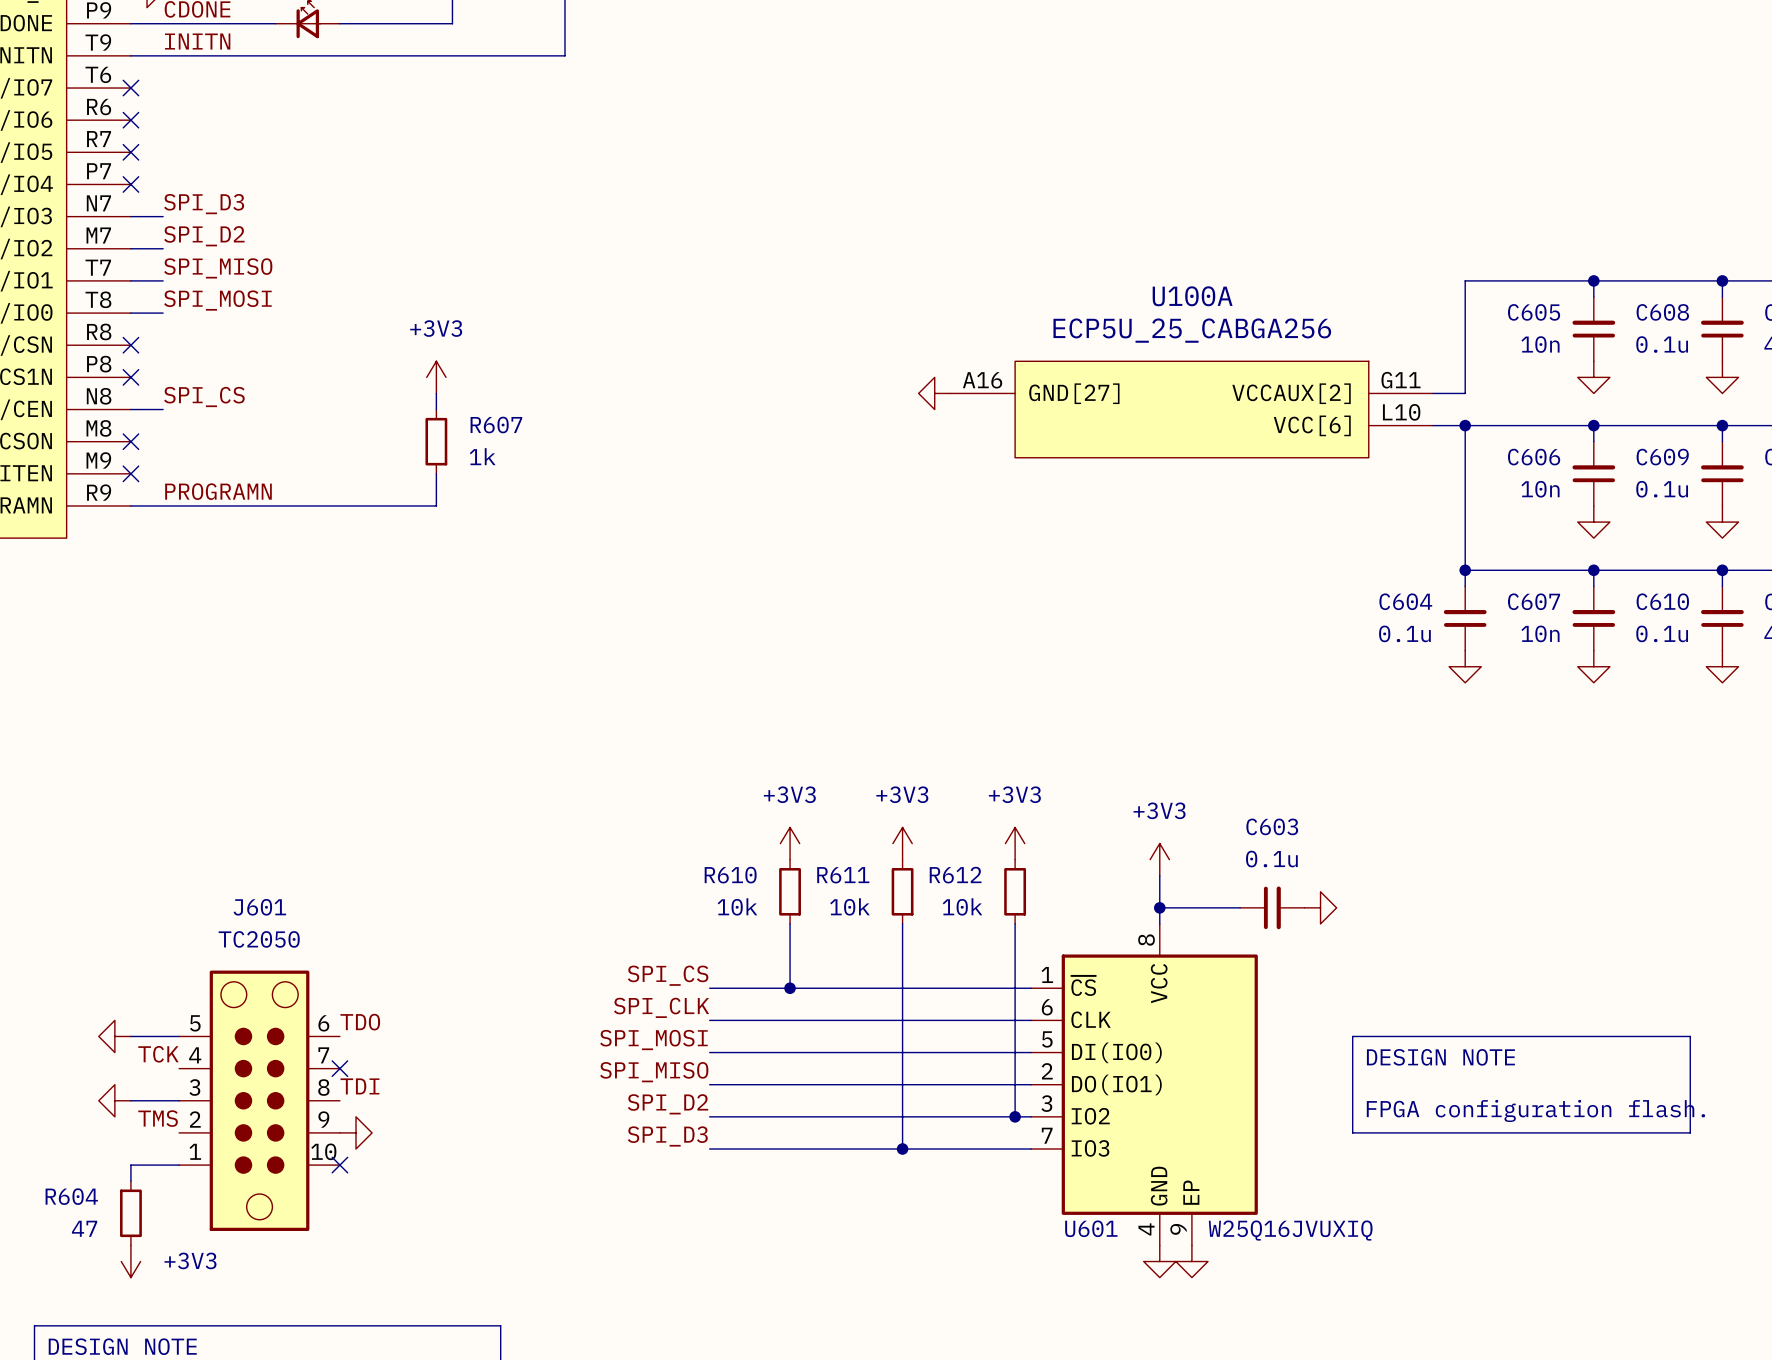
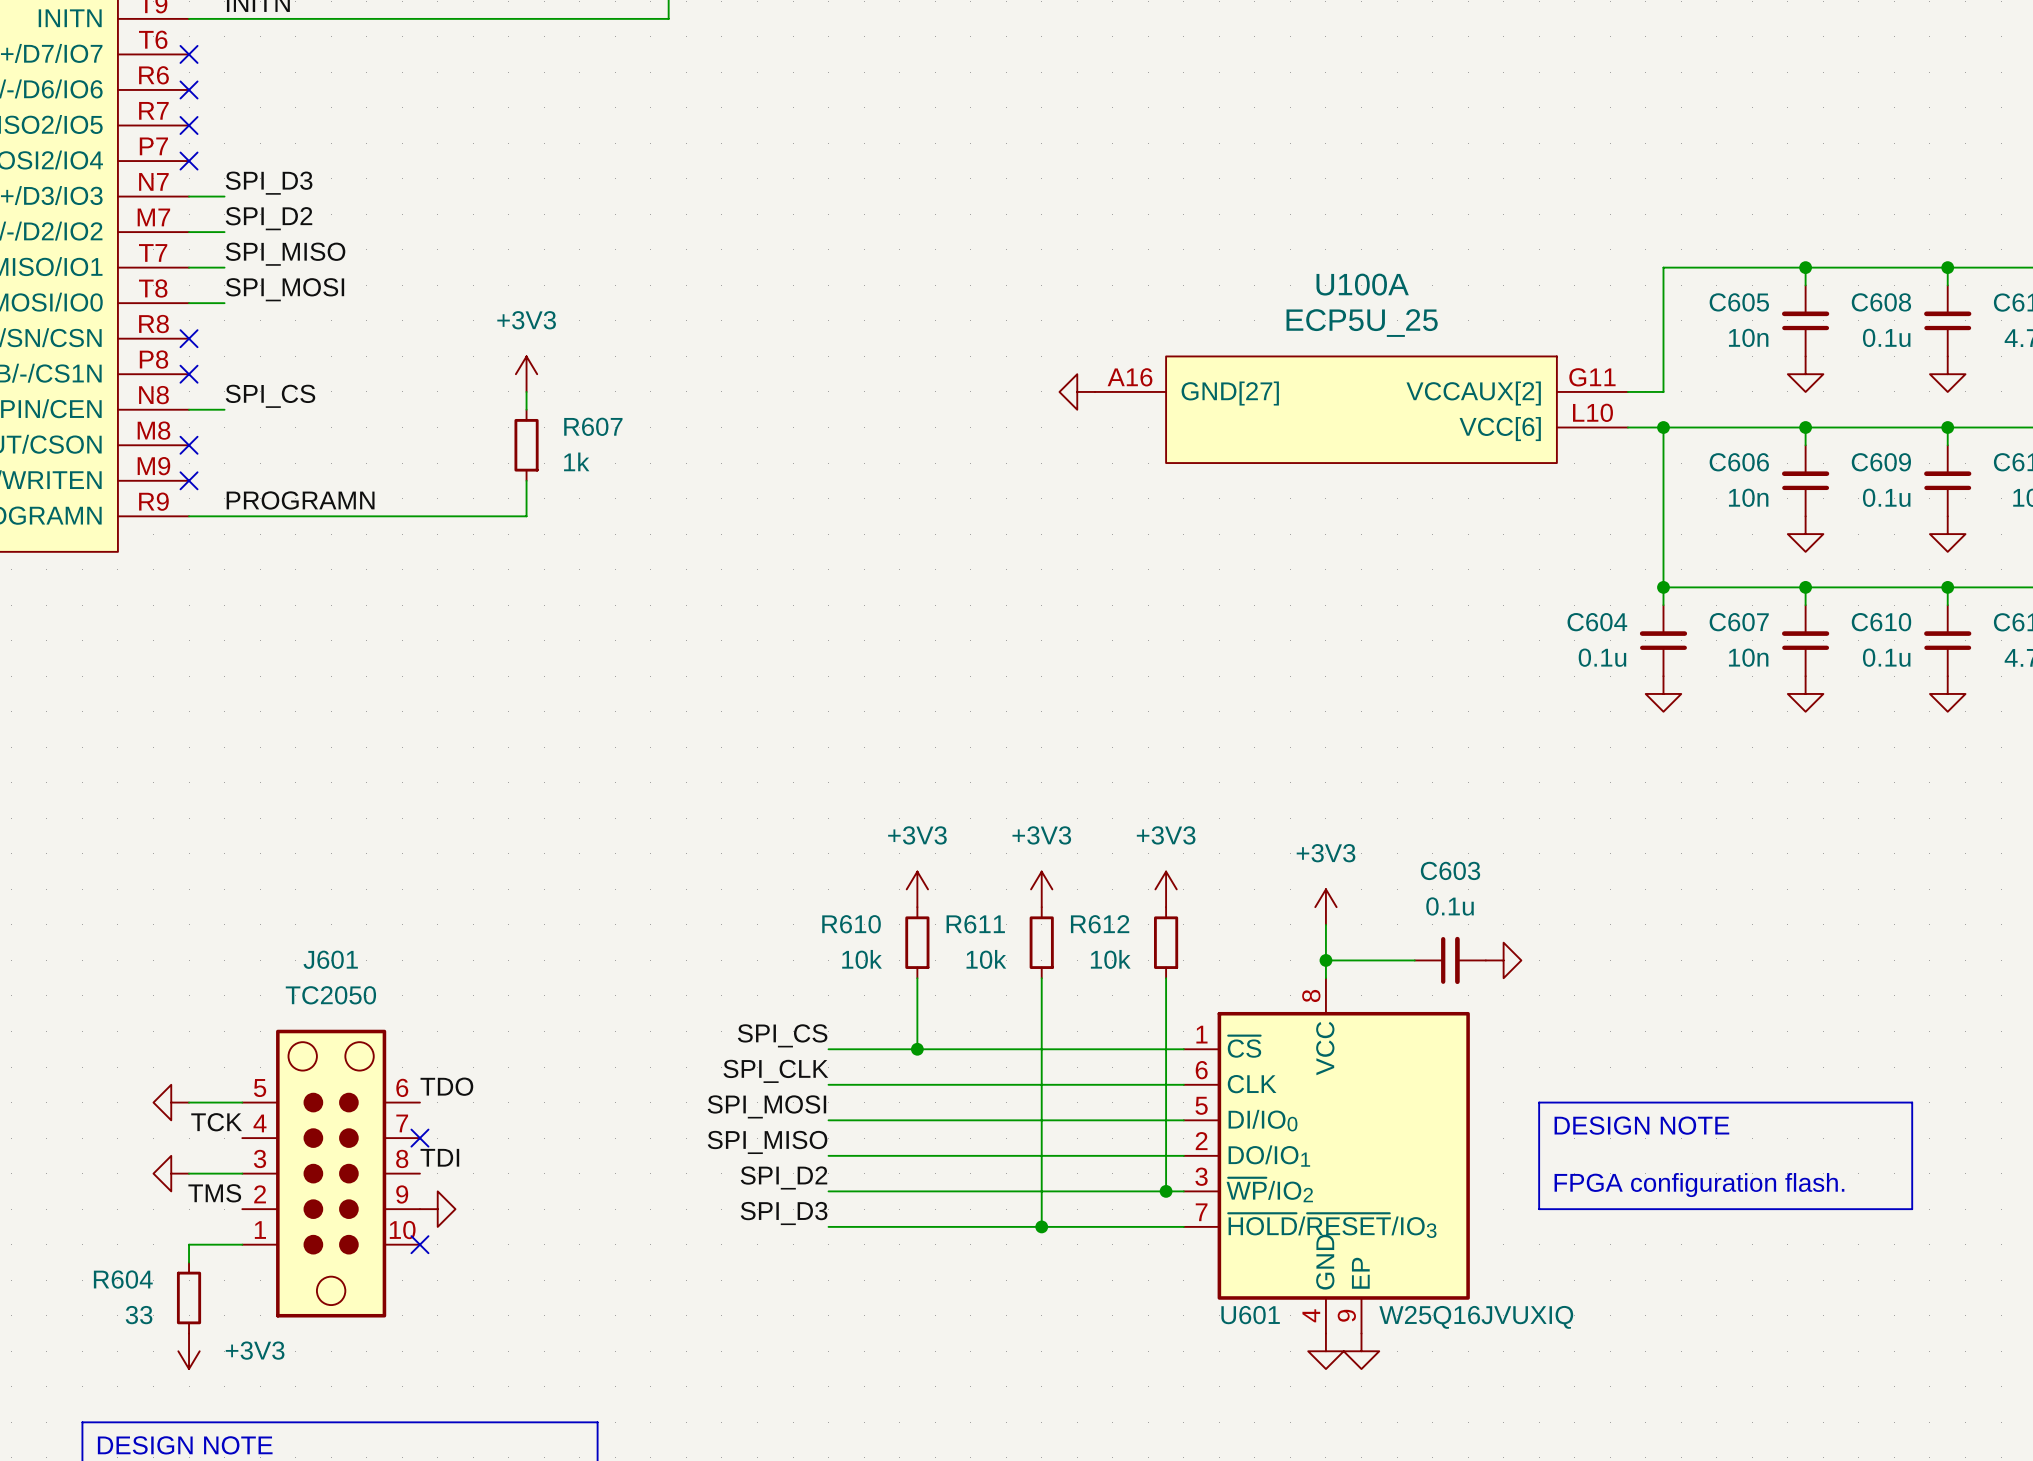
U100A value: ECP5U_25_CABGA256 (1192, 330) -> ECP5U_25 (1362, 323)
U601 symbol: [1031, 923, 1258, 1246] -> [1183, 978, 1470, 1334]
R604 value: 47 (84, 1228) -> 33 (139, 1315)

